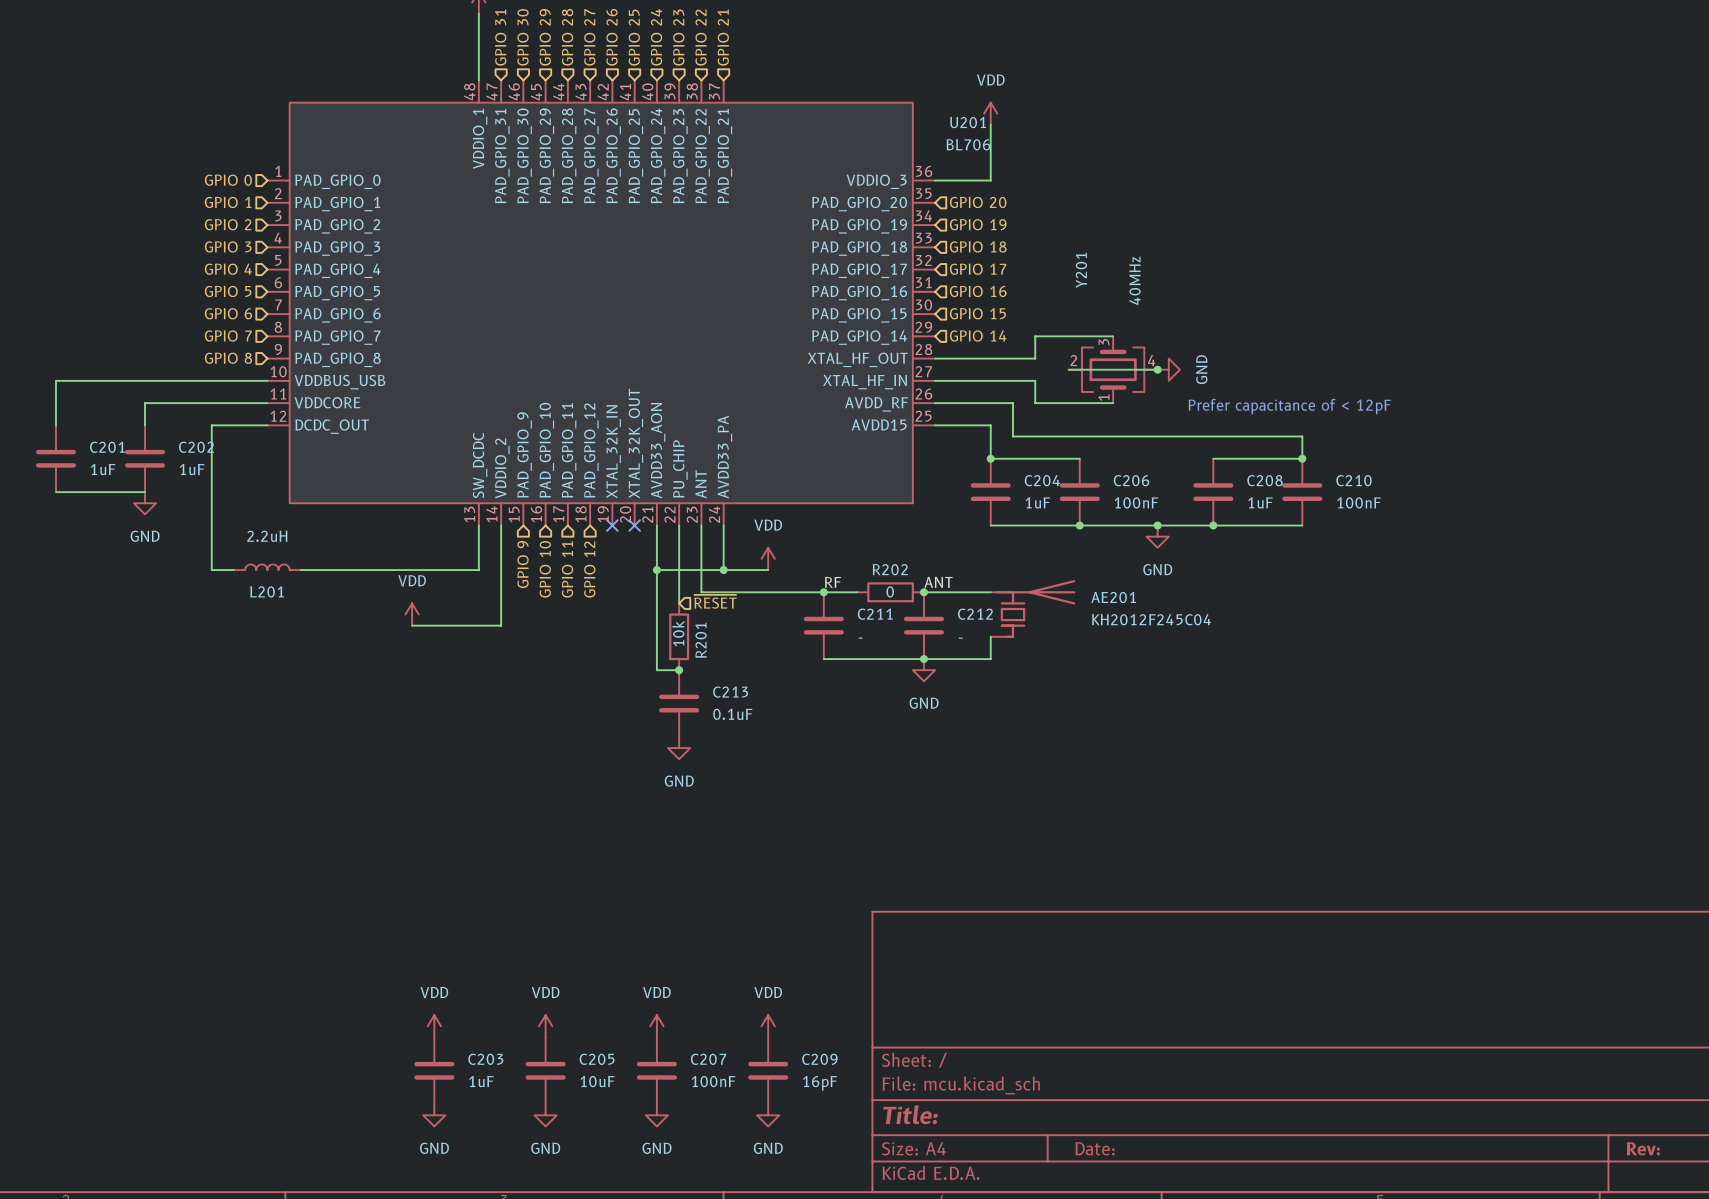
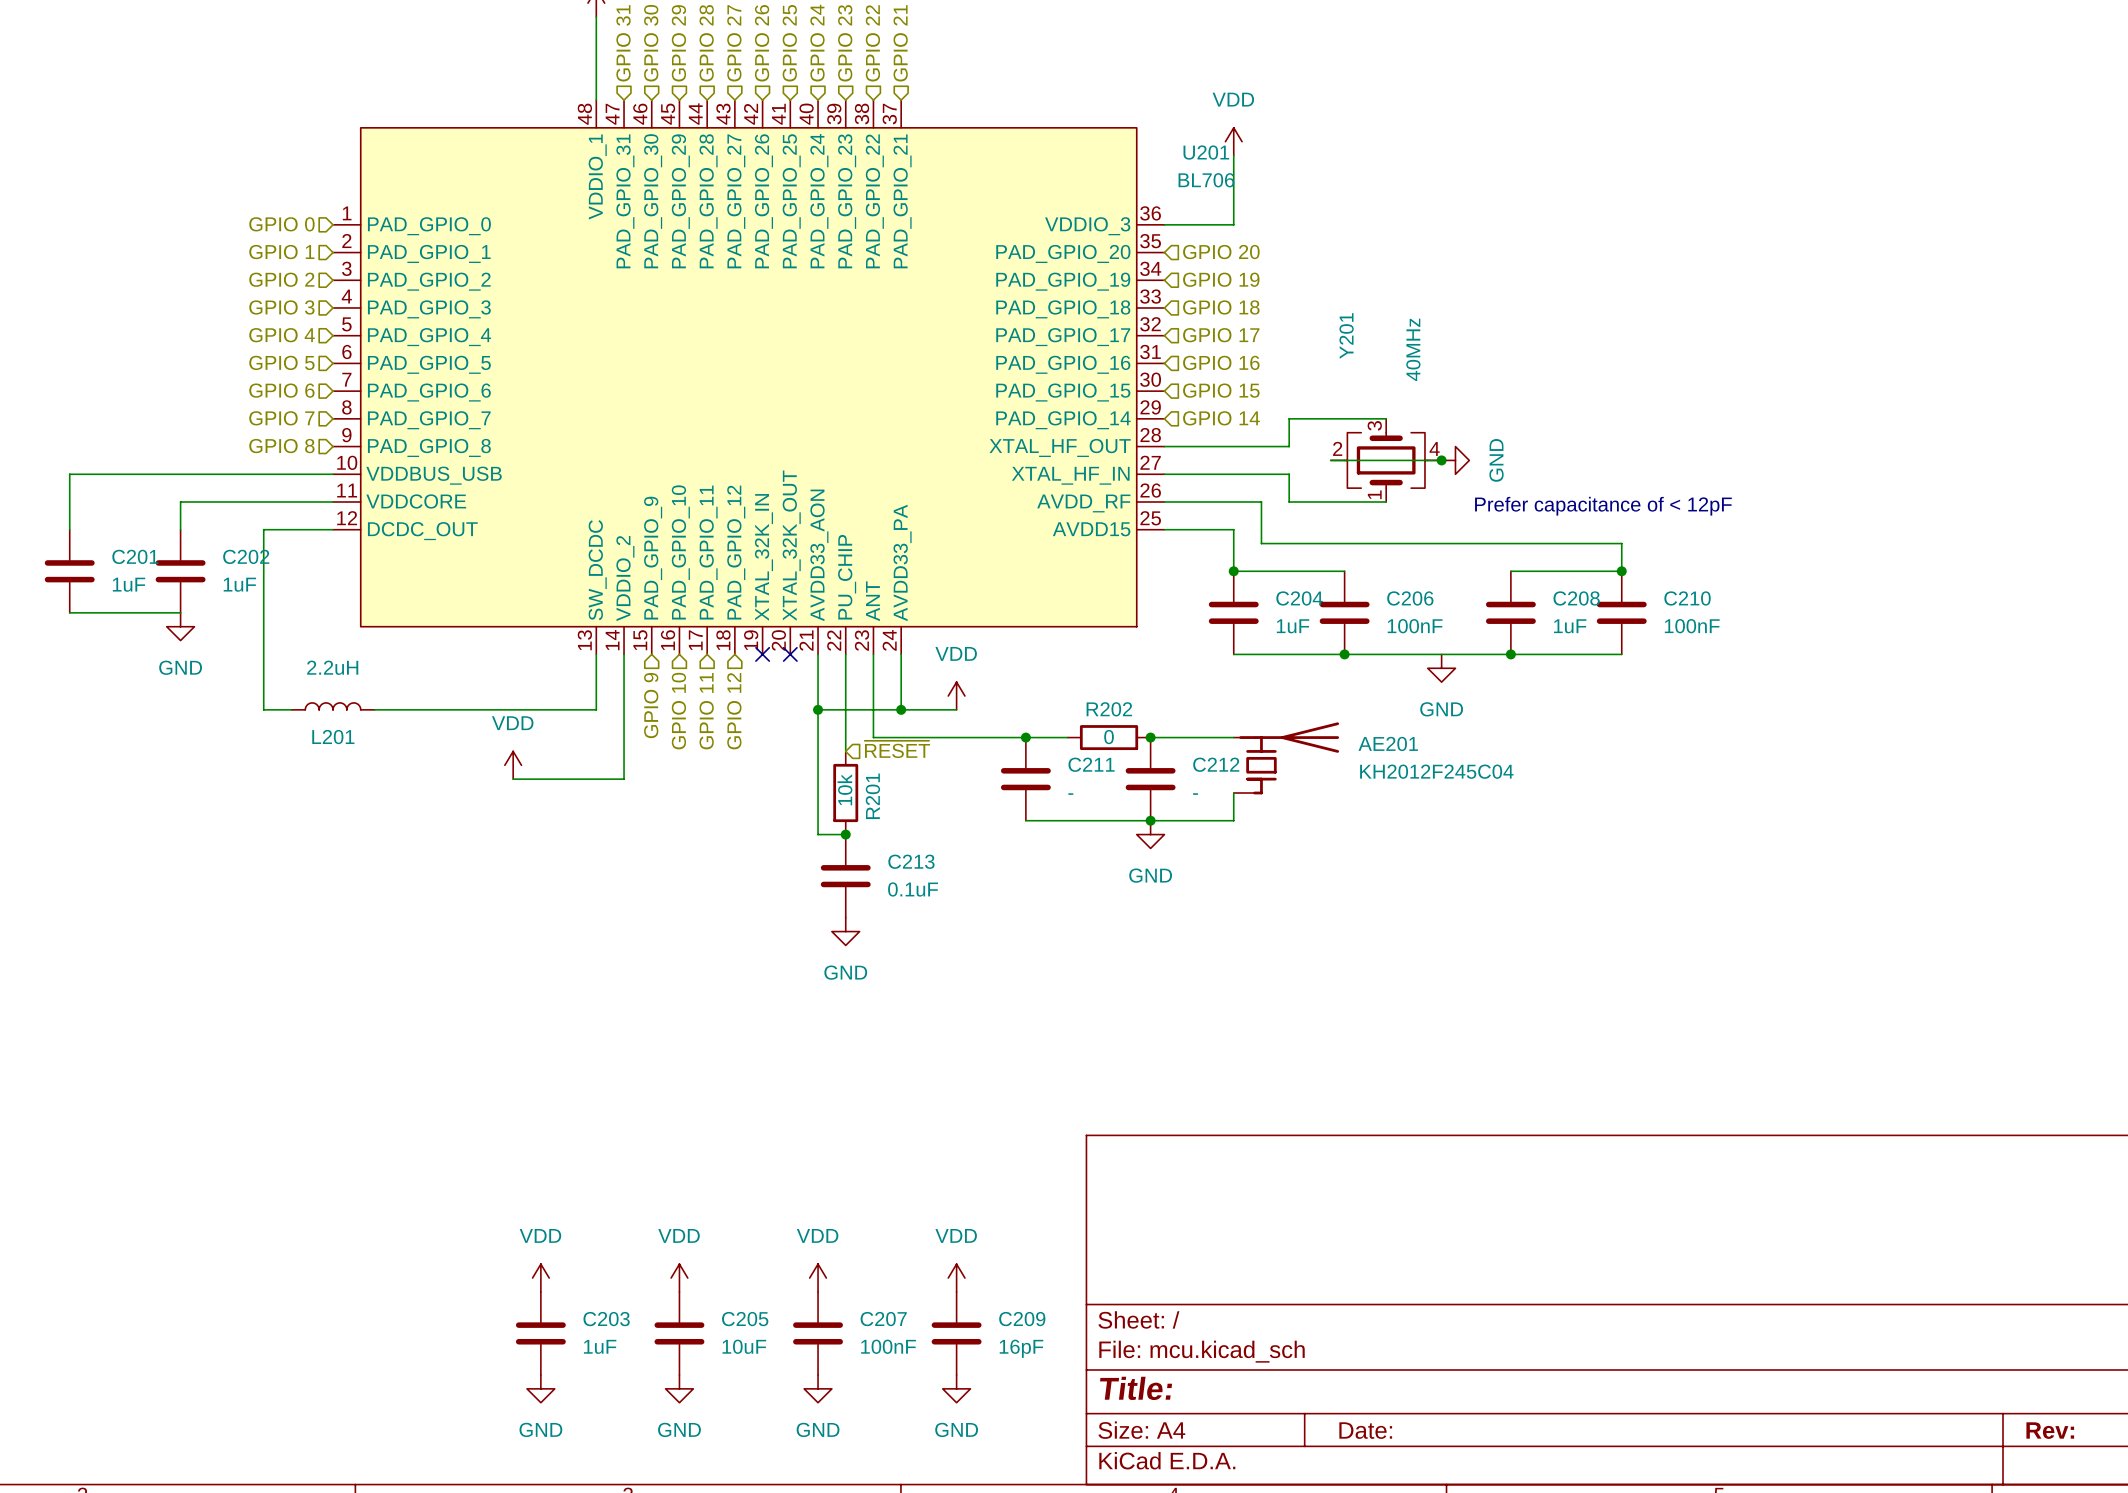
junction: (1157, 525) -> none
label: RF (832, 582) -> none
label: ANT (938, 582) -> none

